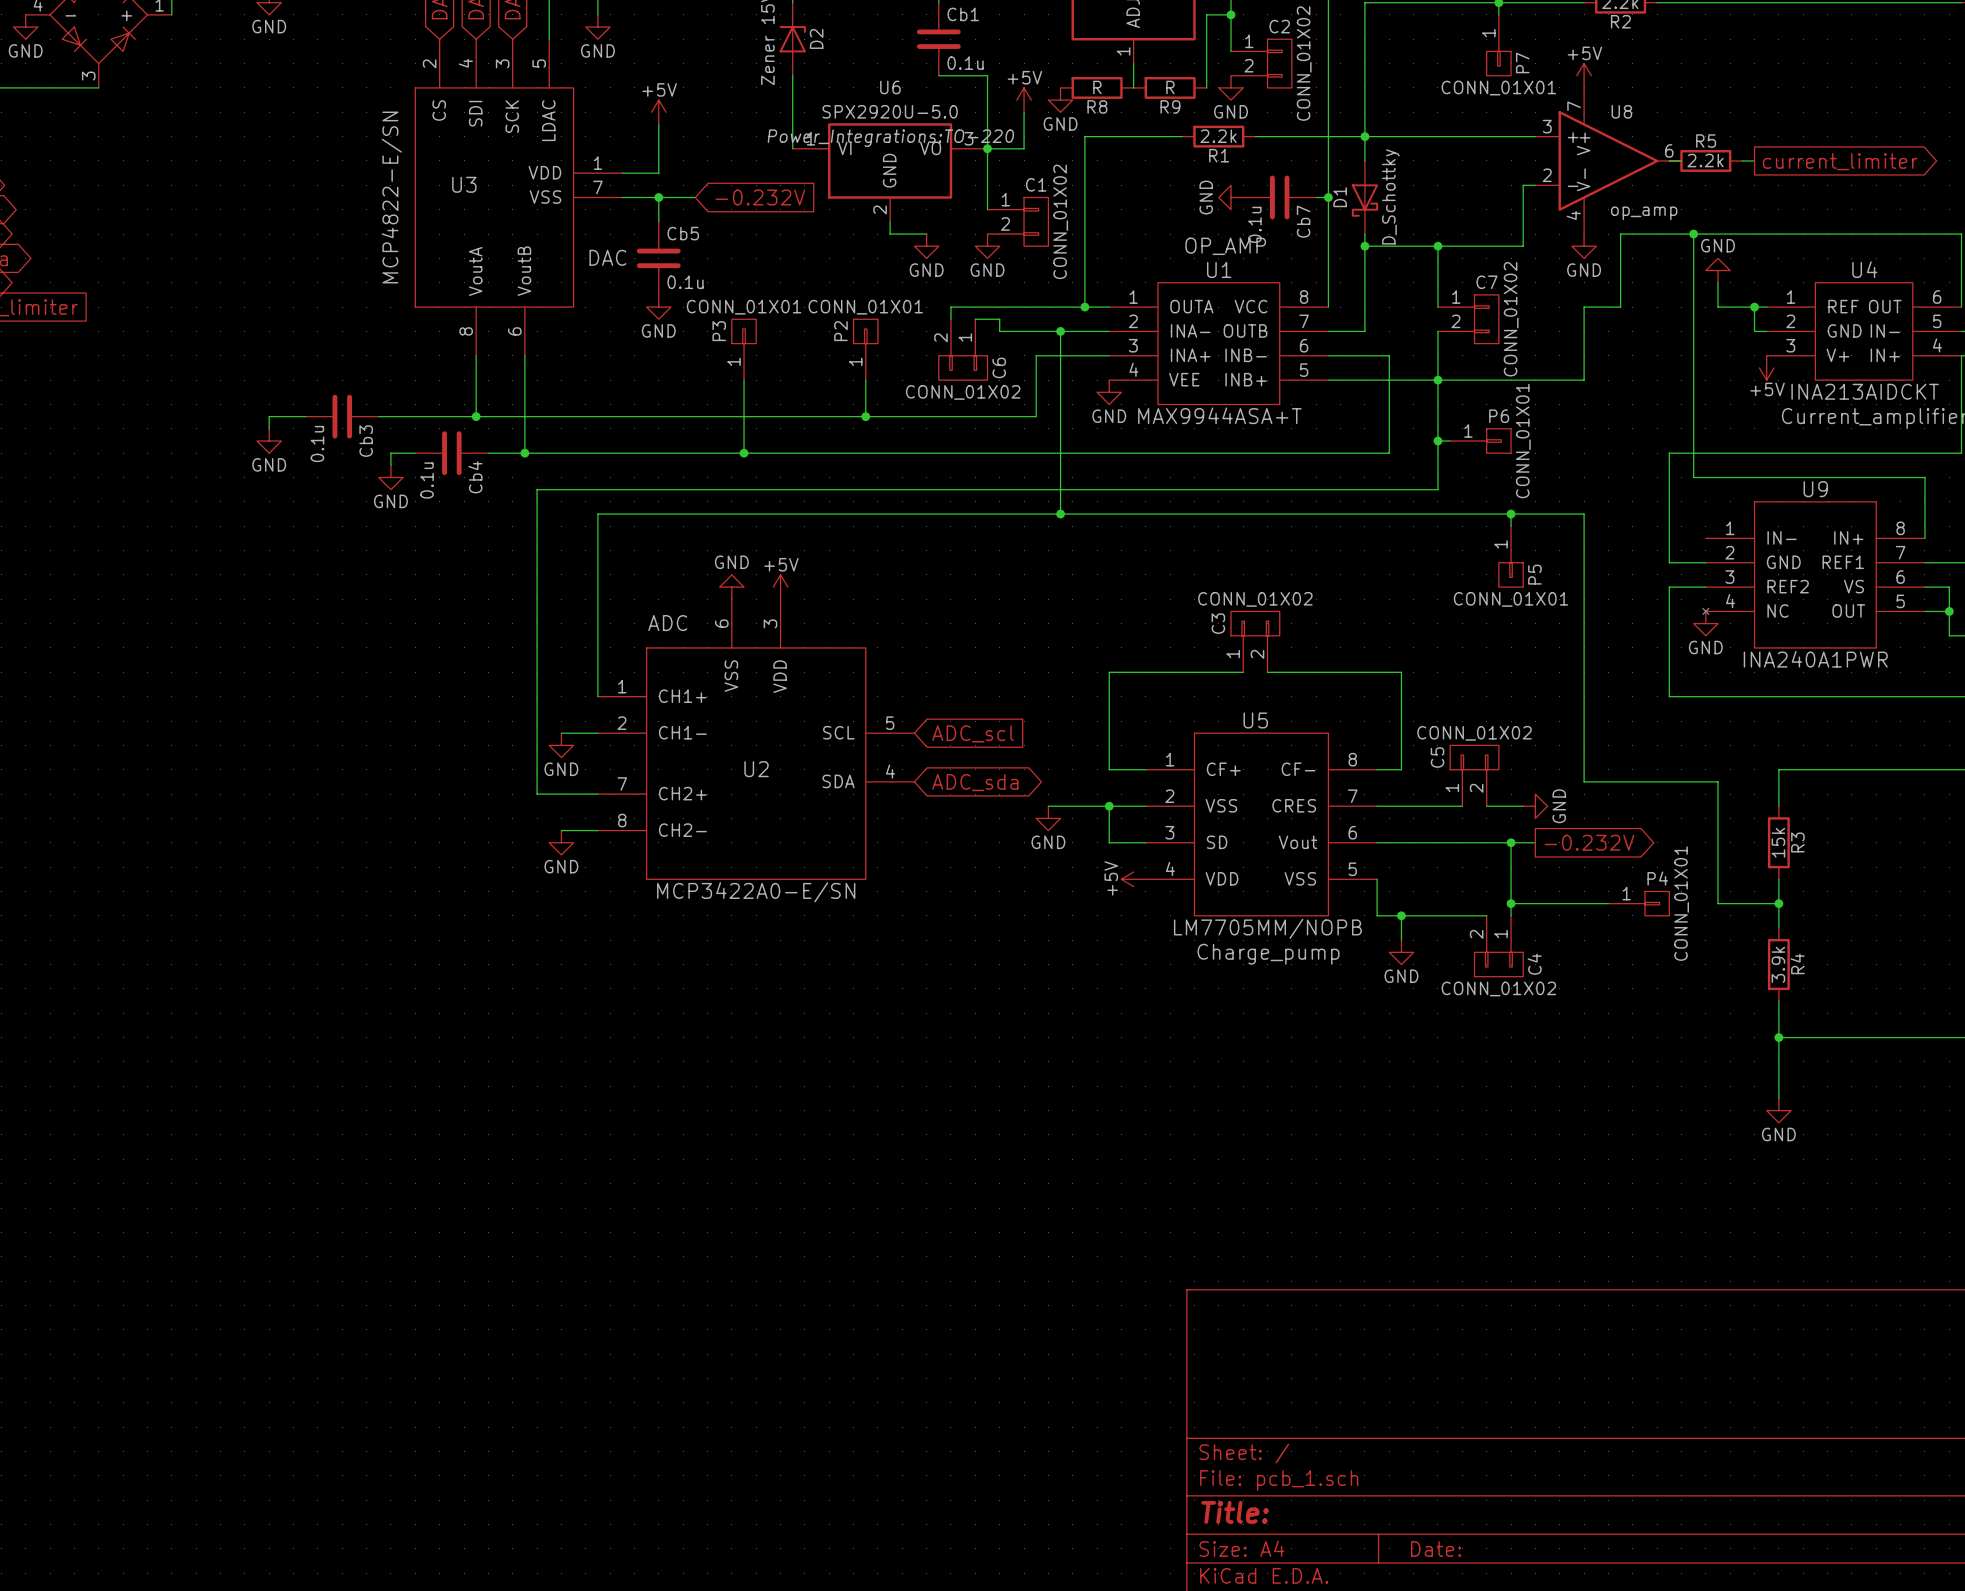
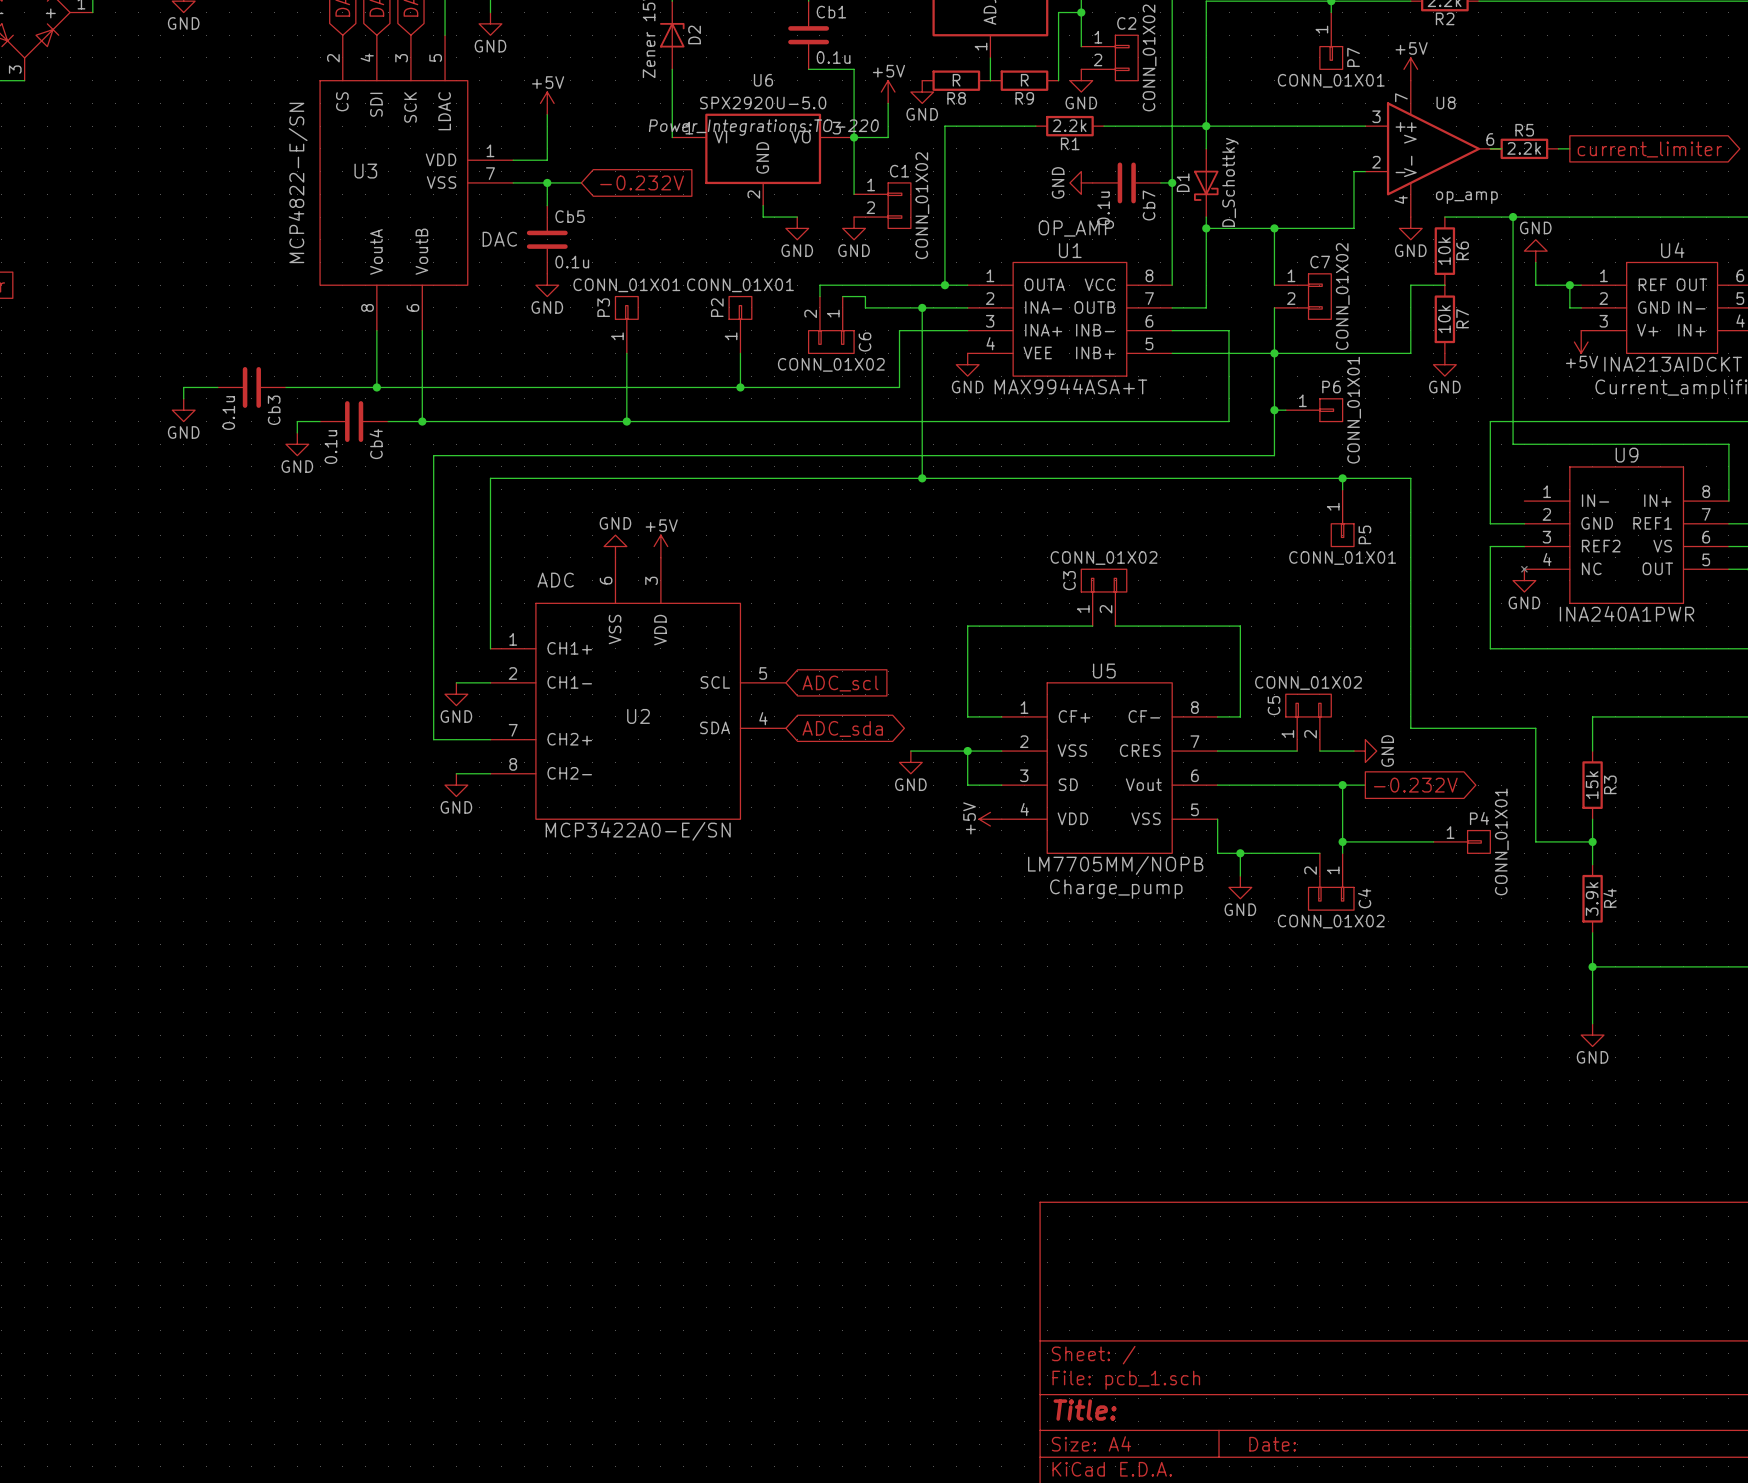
wire: (1620, 234) (1620, 307) -> none
R6: none -> 10k (1444, 251)
R7: none -> 10k (1444, 319)
power symbol: none -> GND (1444, 364)

